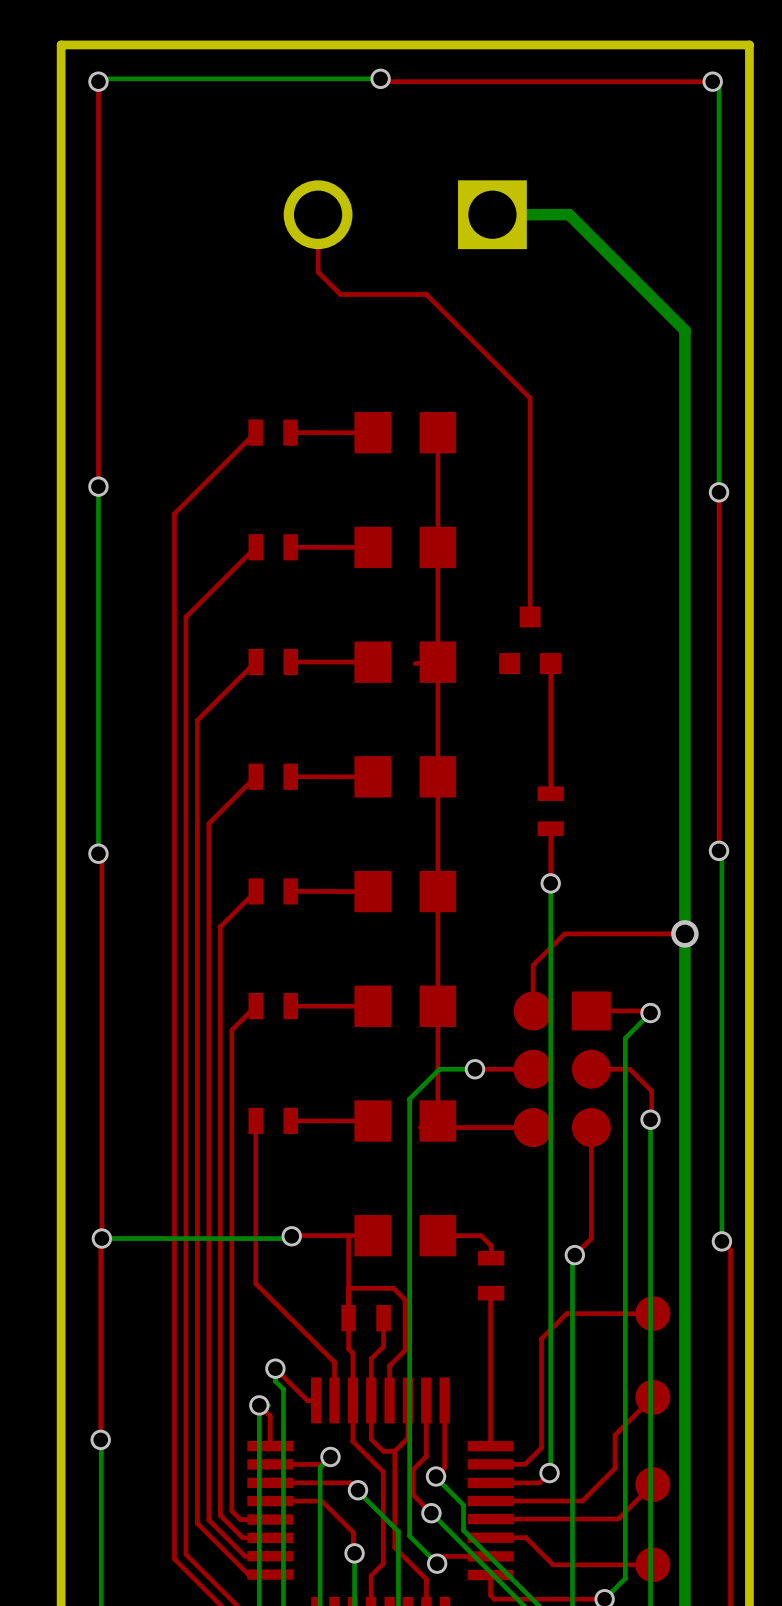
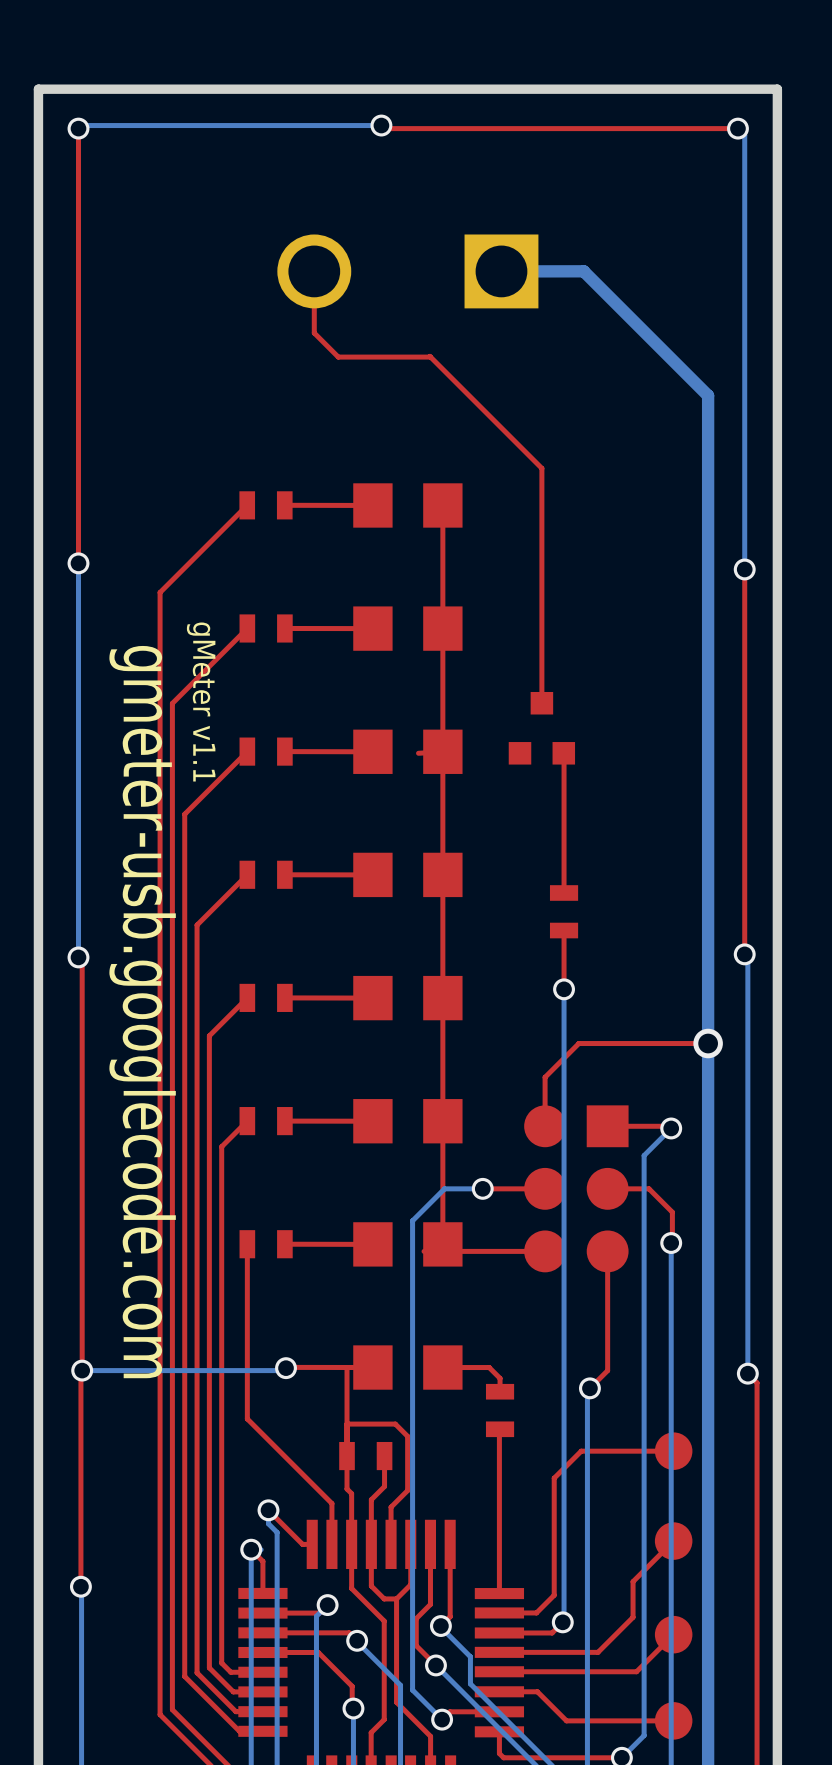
text: none -> gMeter v1.1 (201, 701)
text: none -> gmeter-usb.googlecode.com (142, 1012)

